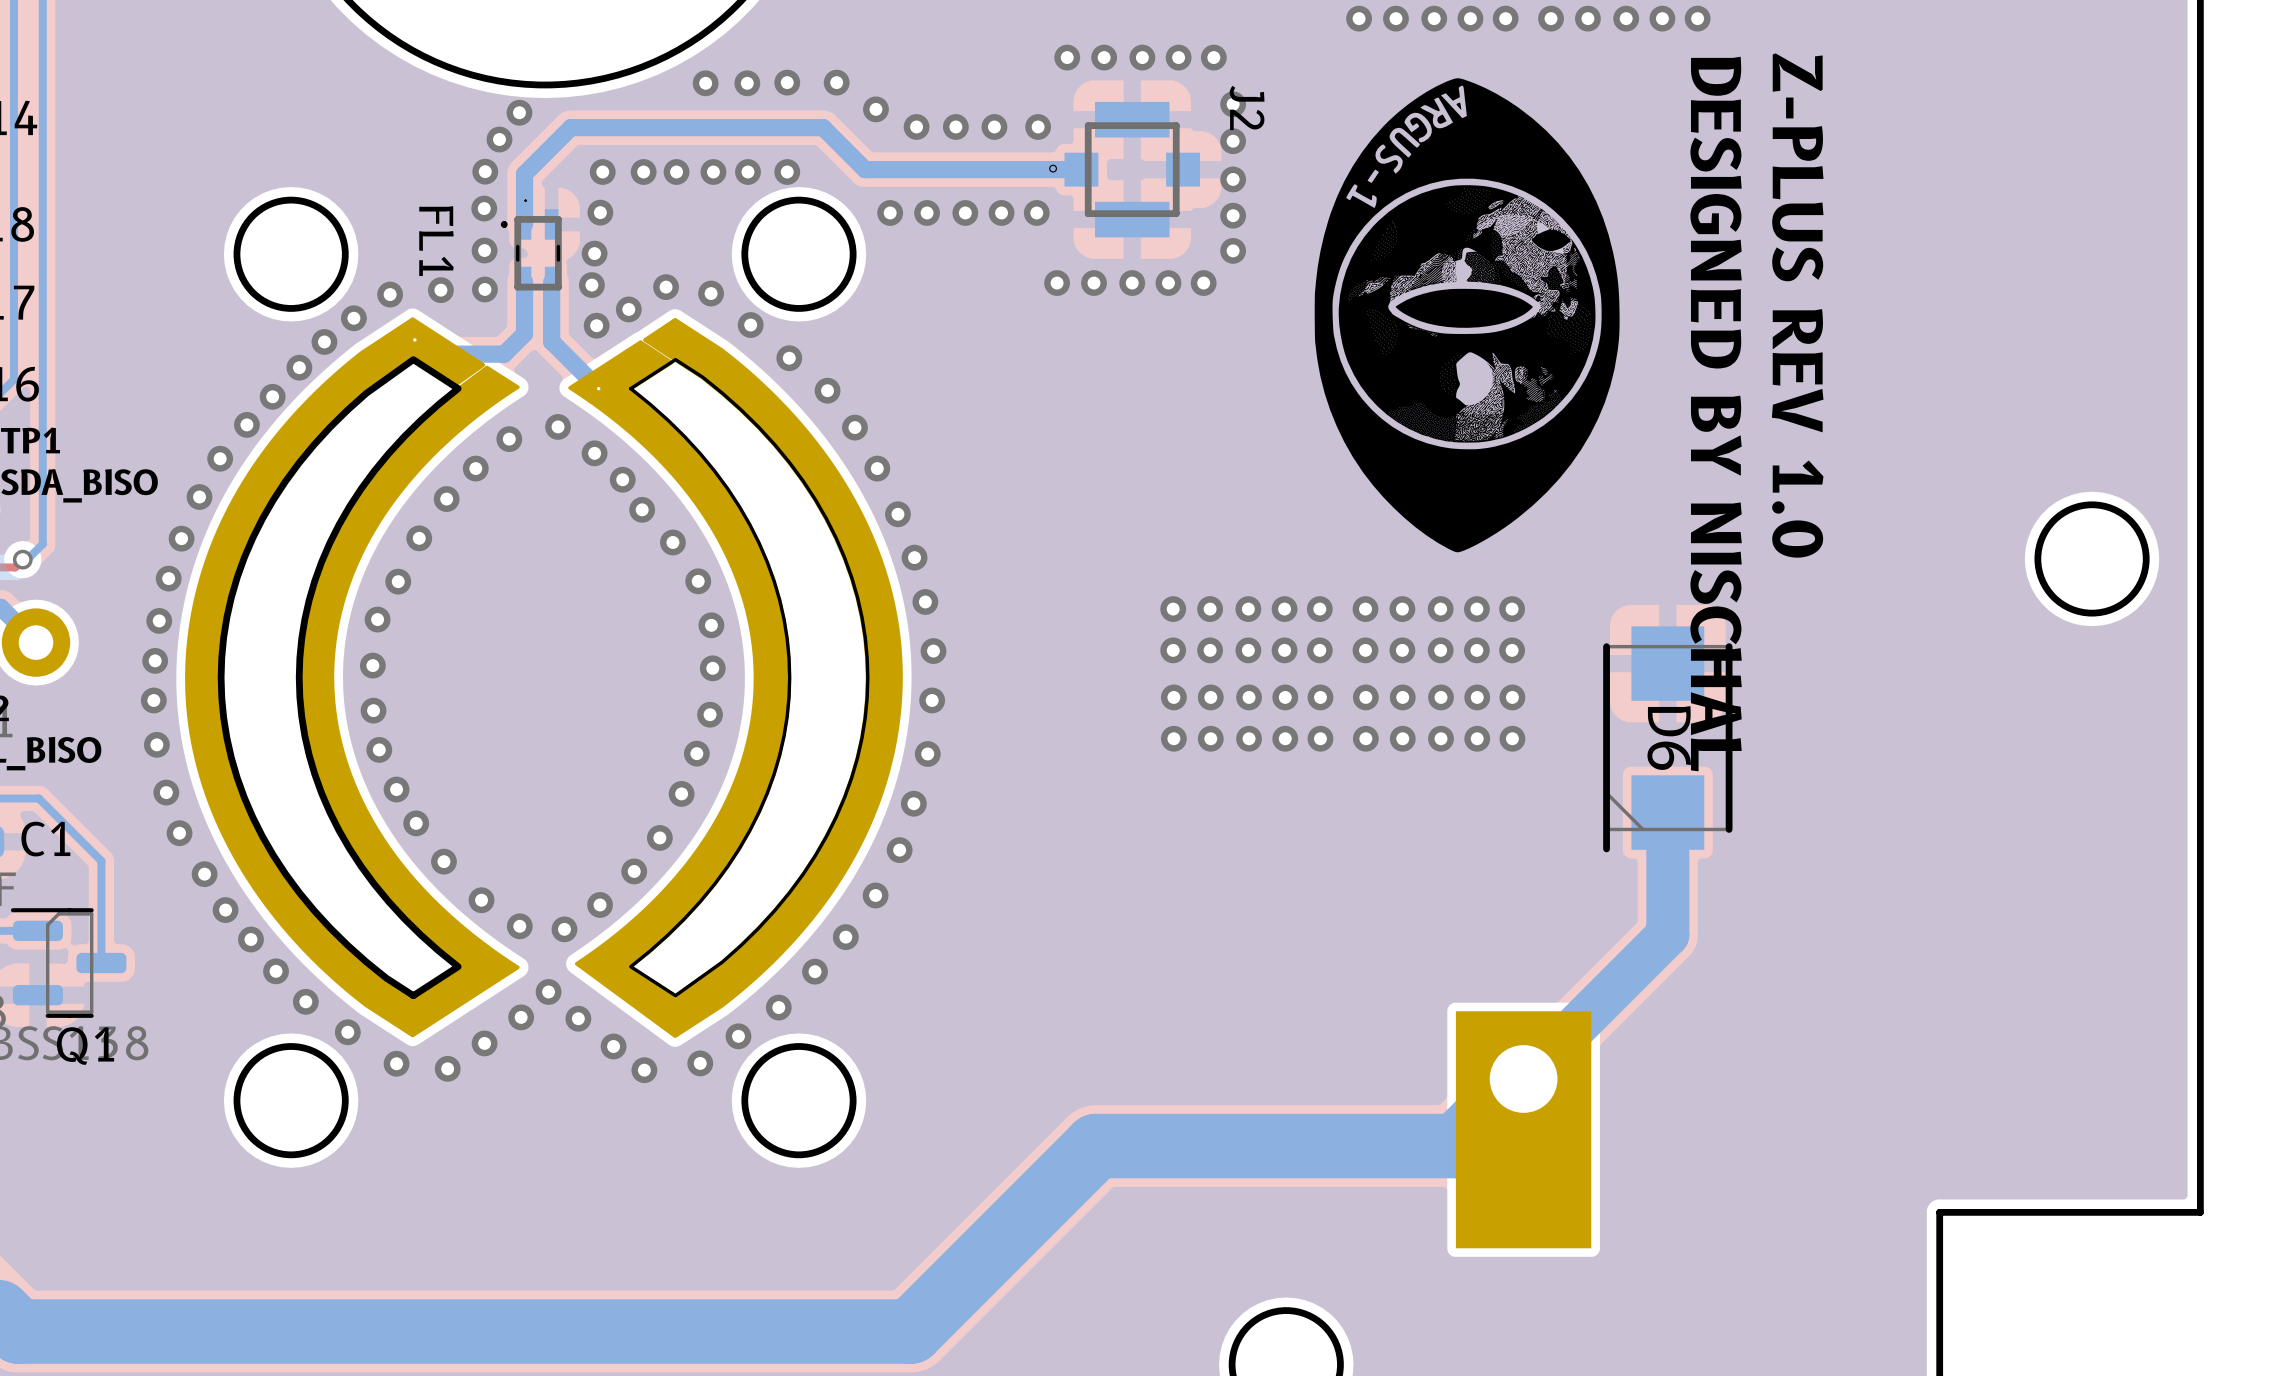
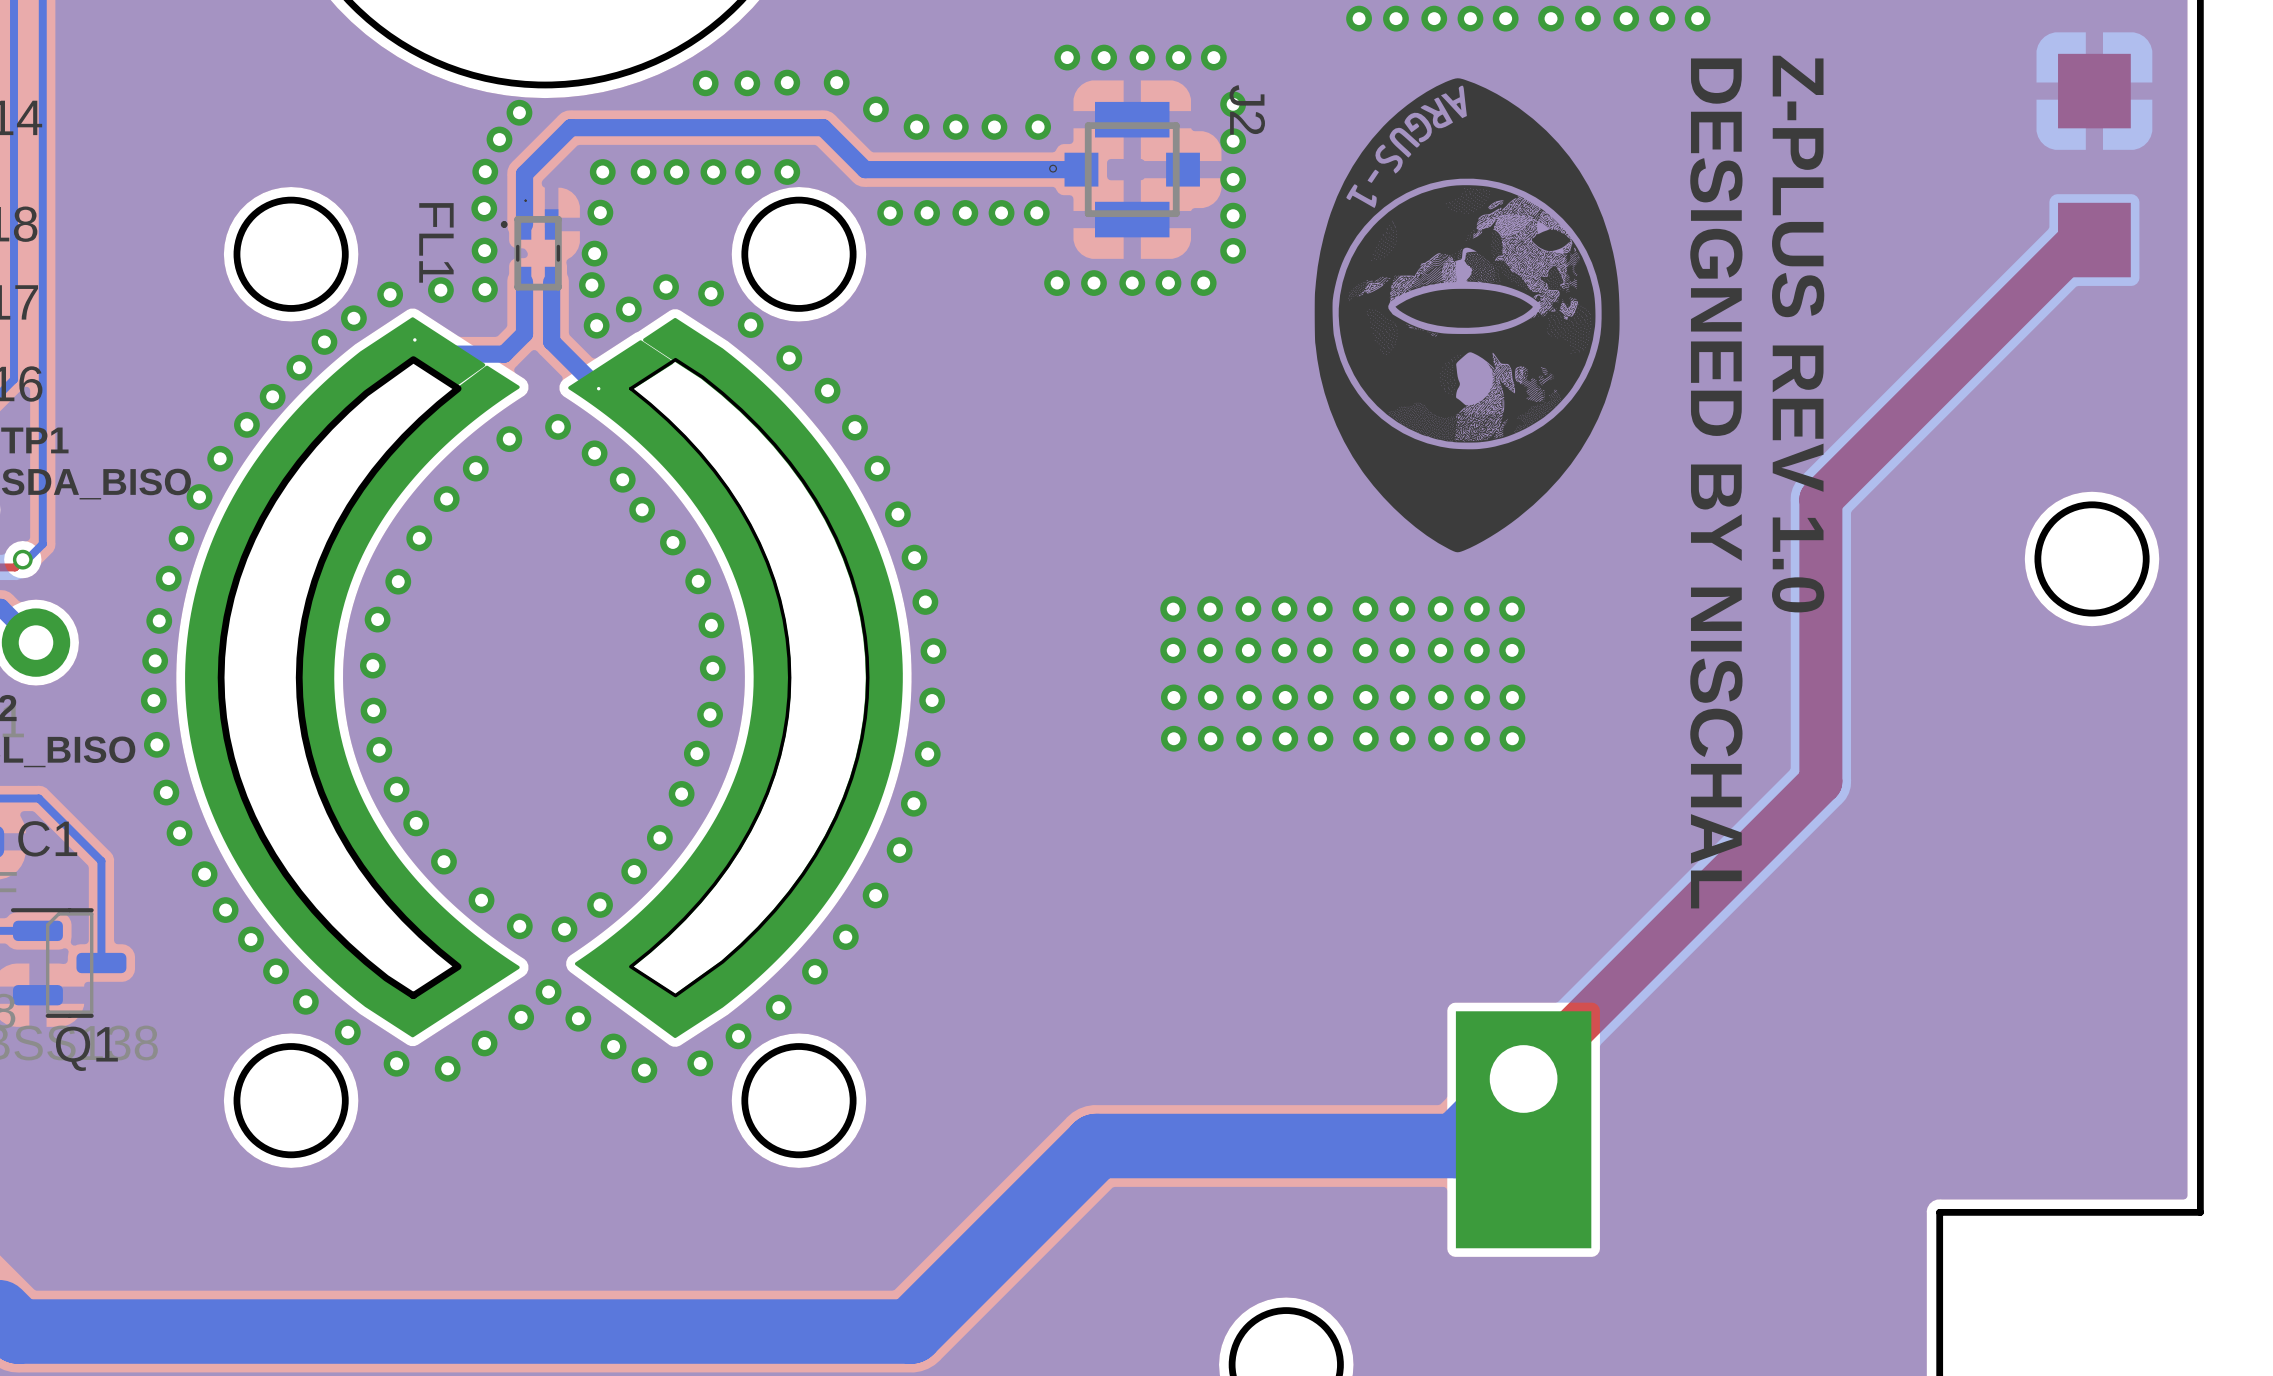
part: none -> (2094, 165)
top track: none -> (2094, 240) (2080, 240) (1820, 499) (1820, 781) (1523, 1078)
D6: (1667, 739) -> none
bottom track: (1667, 812) (1667, 934) (1523, 1078) -> none

